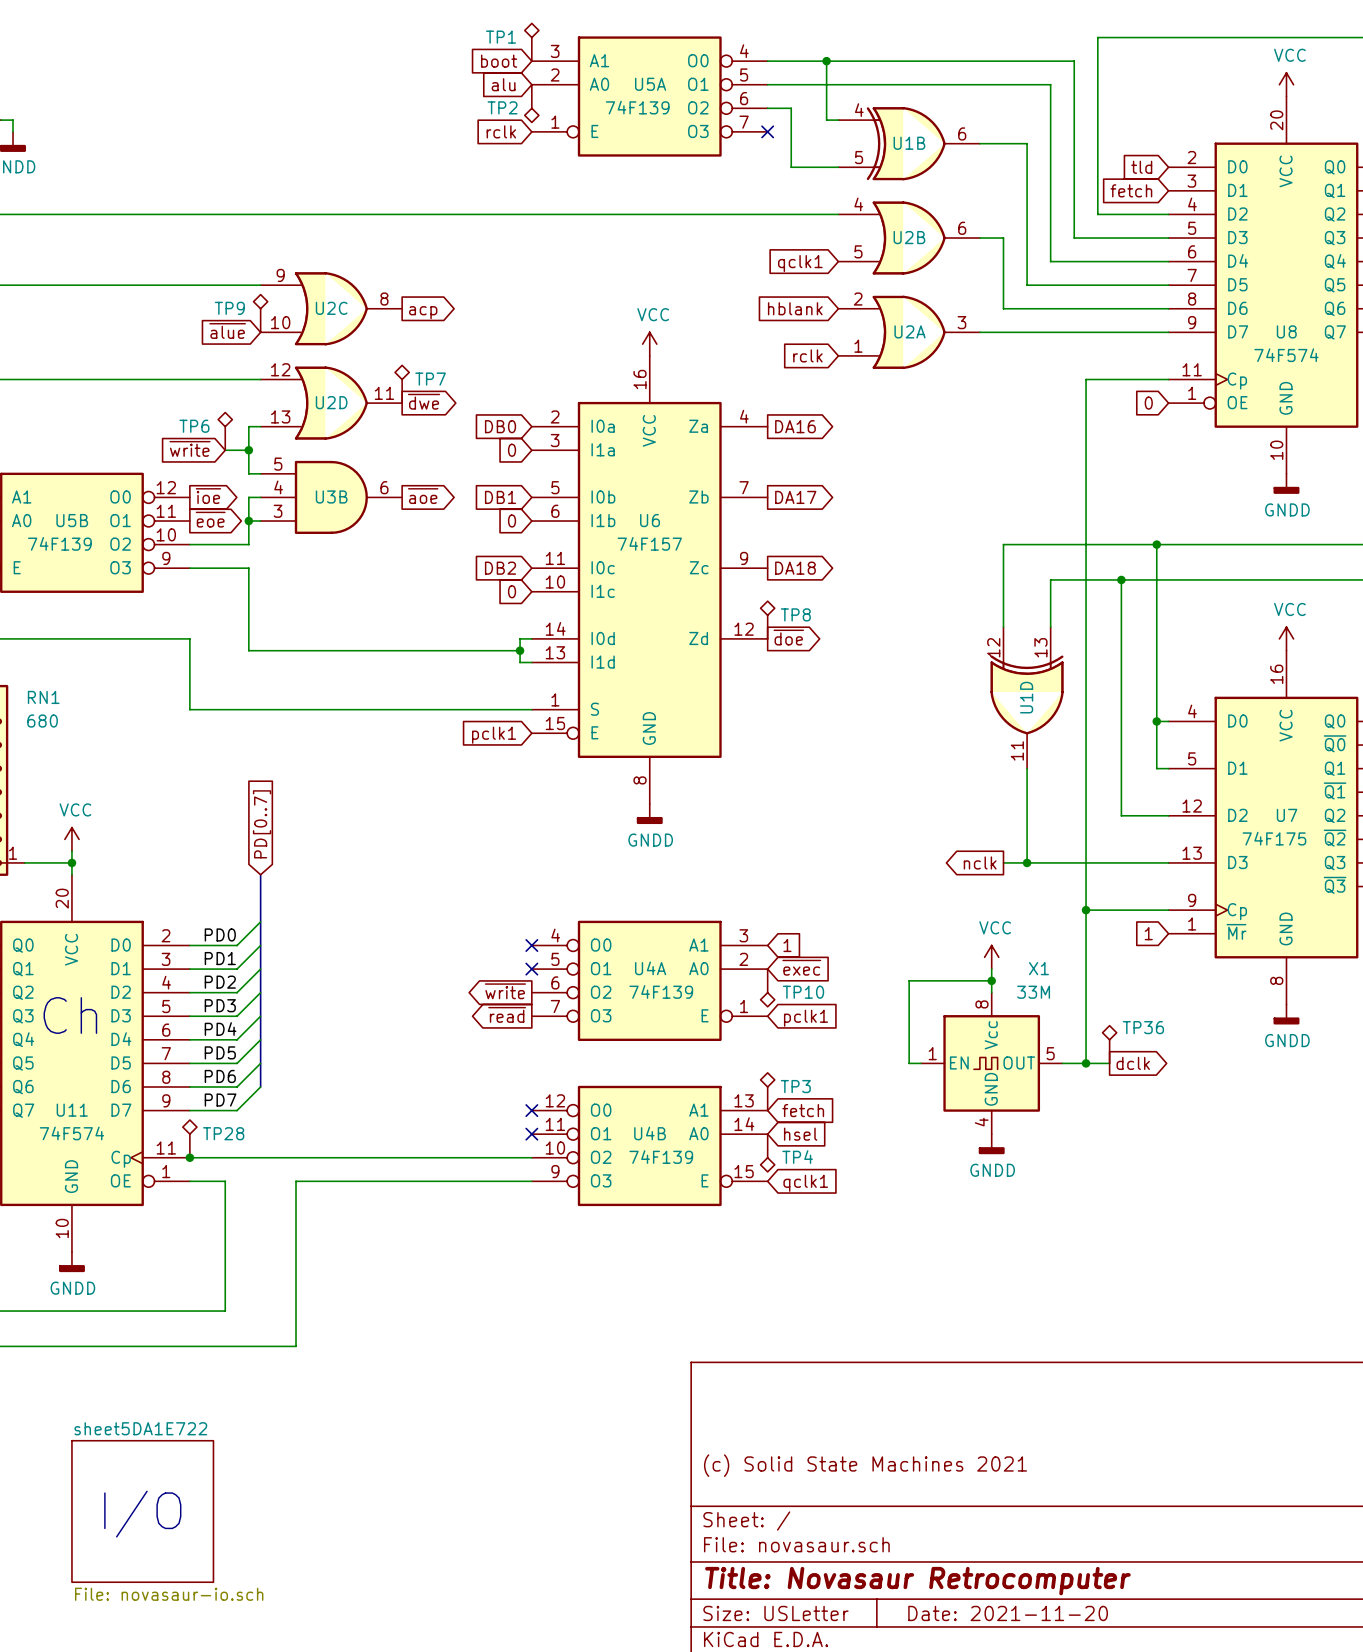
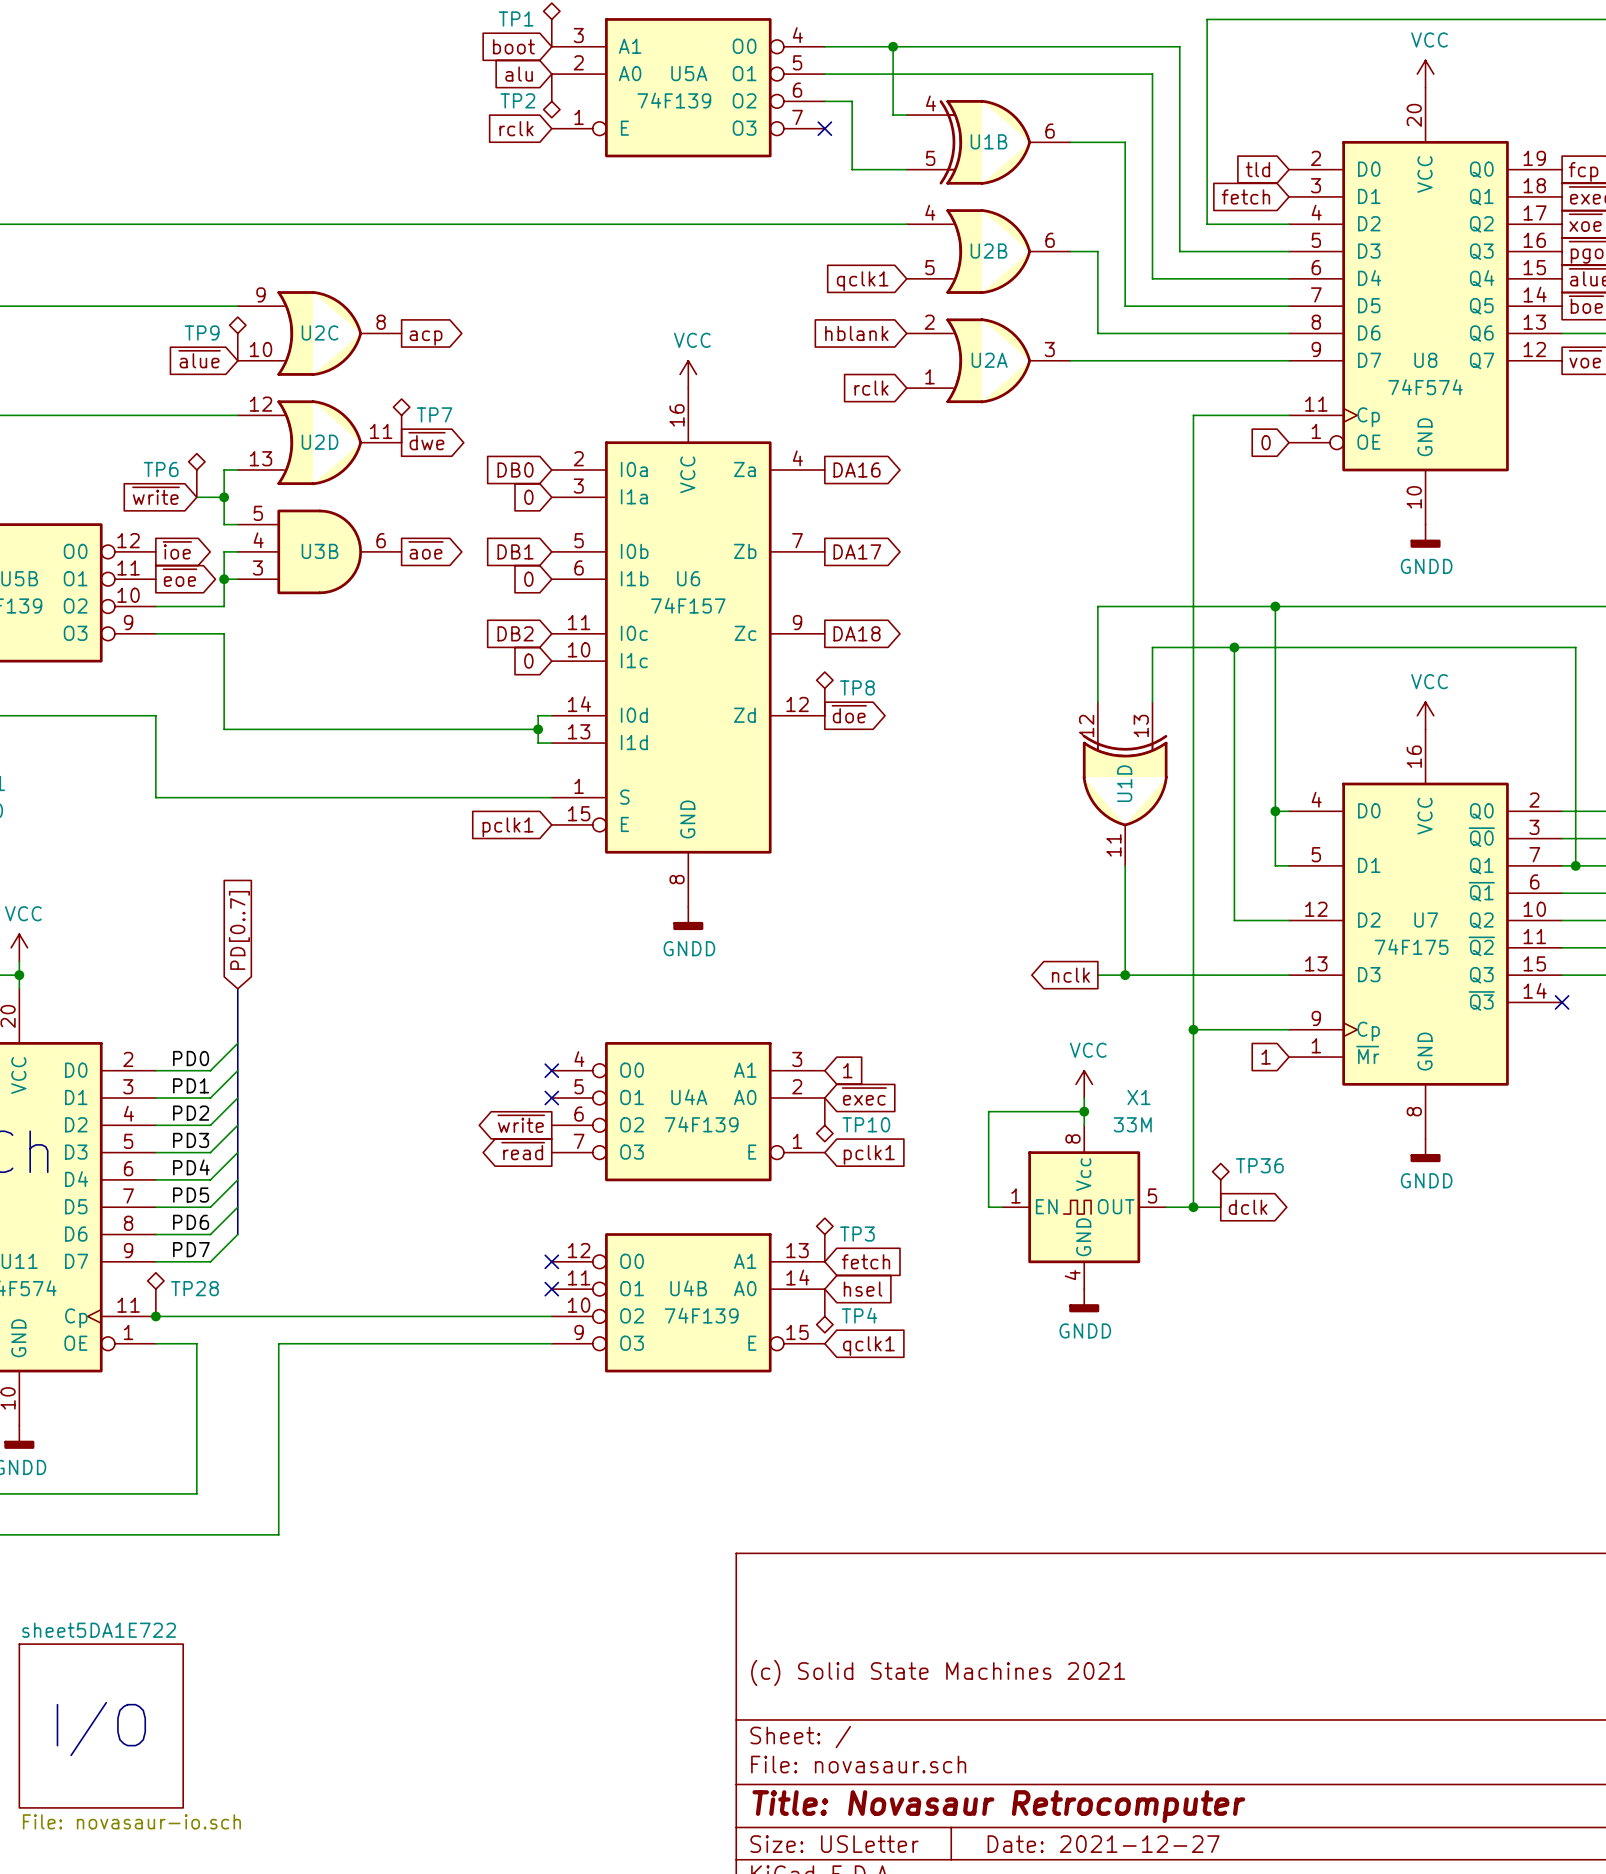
title block: Date: 2021-11-20 (1008, 1613) -> Date: 2021-12-27 (1103, 1844)

